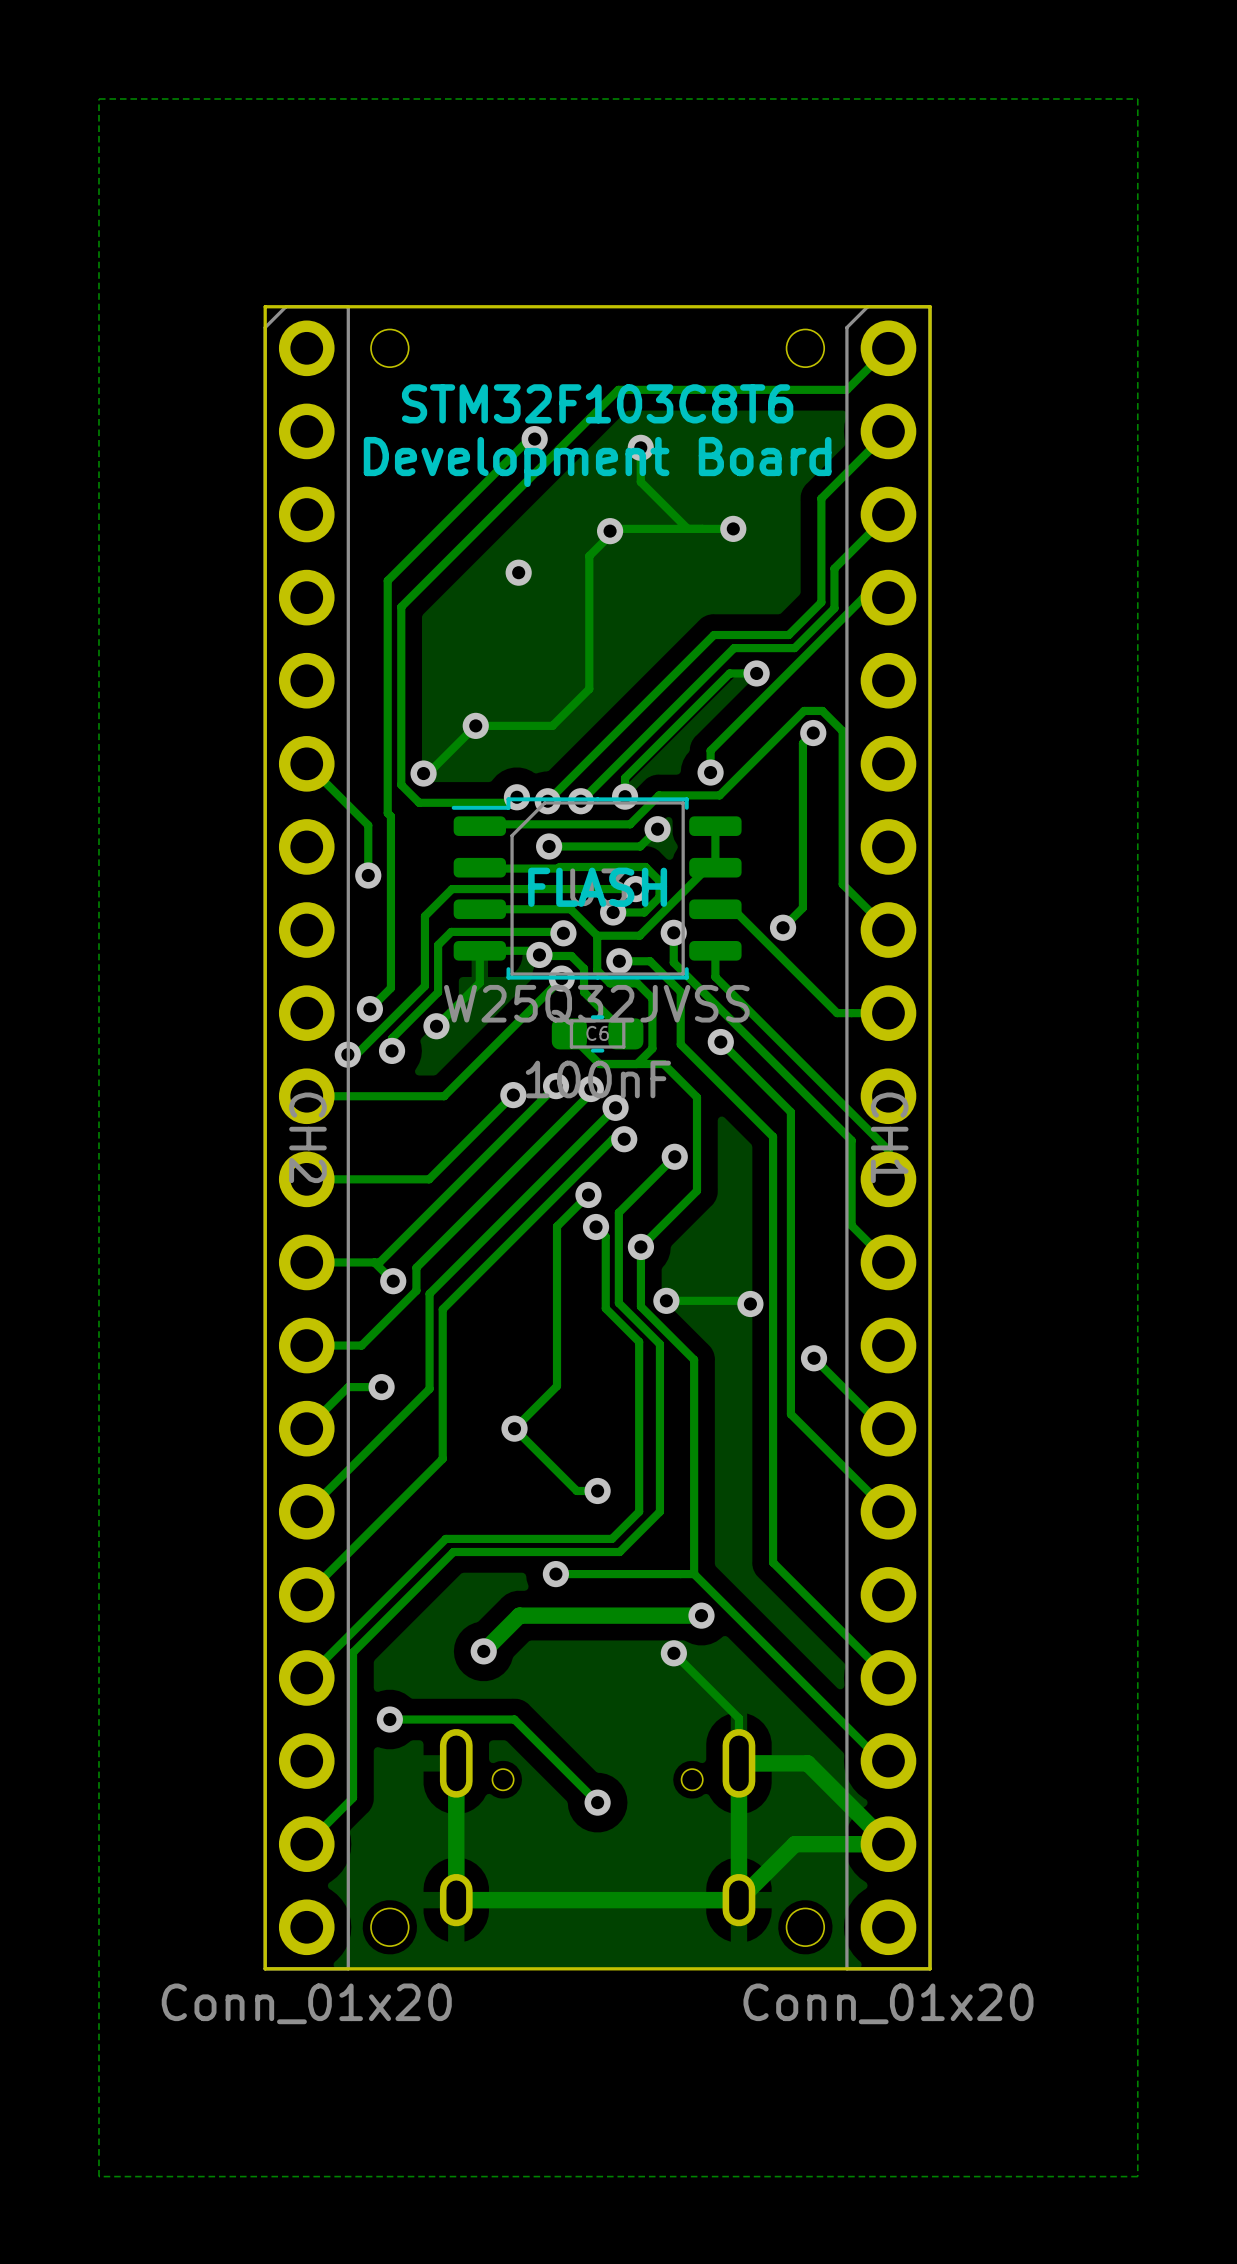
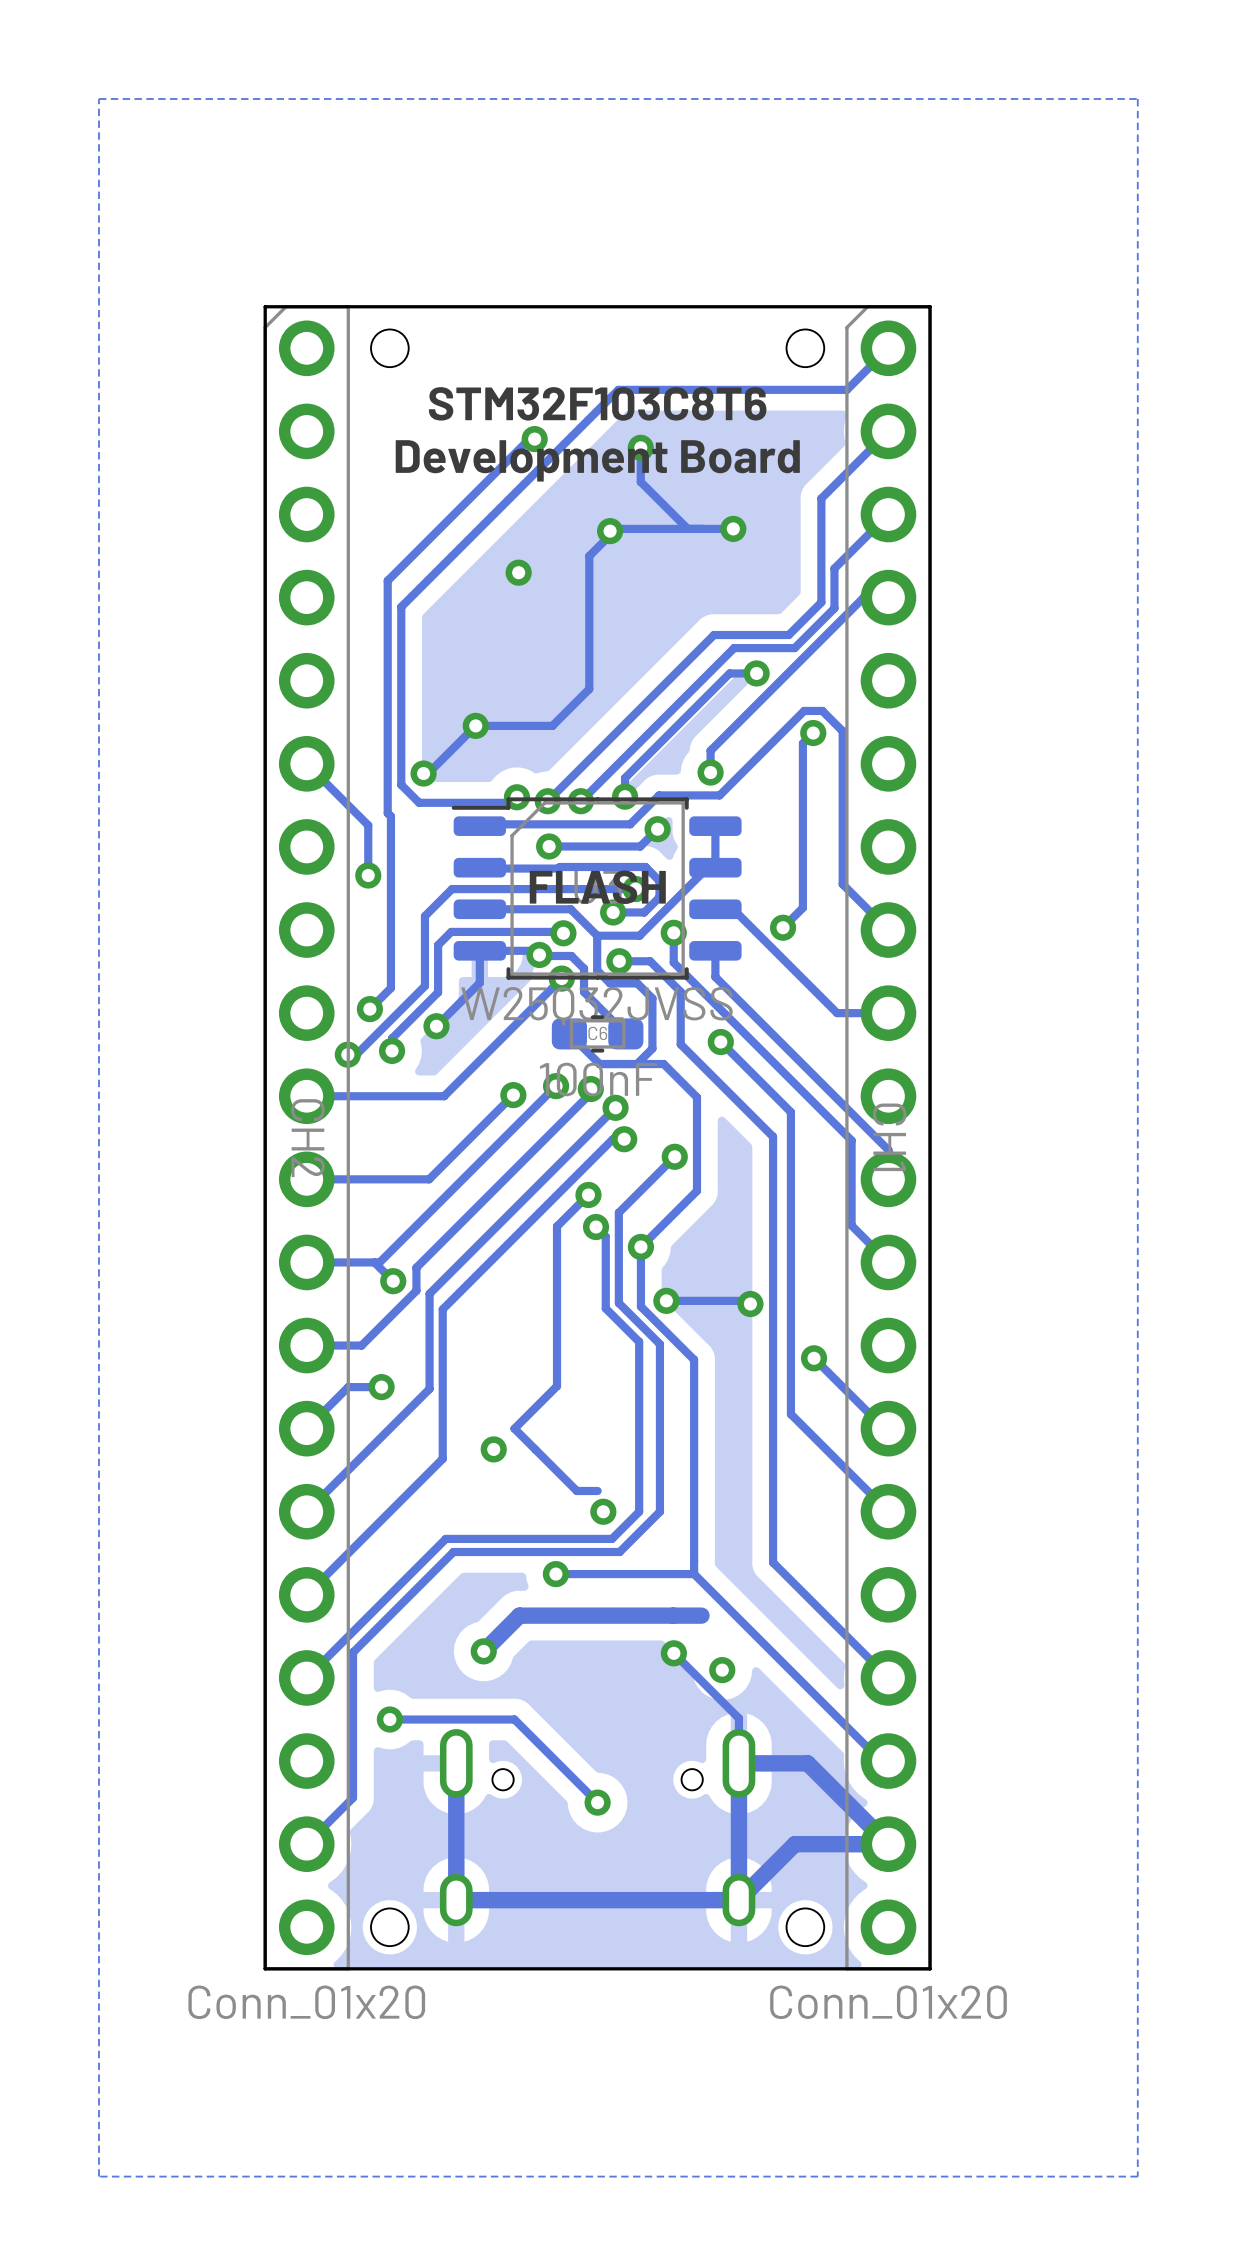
via position: (514, 1428) -> (493, 1449)
via position: (597, 1490) -> (603, 1511)
via position: (701, 1615) -> (722, 1670)

